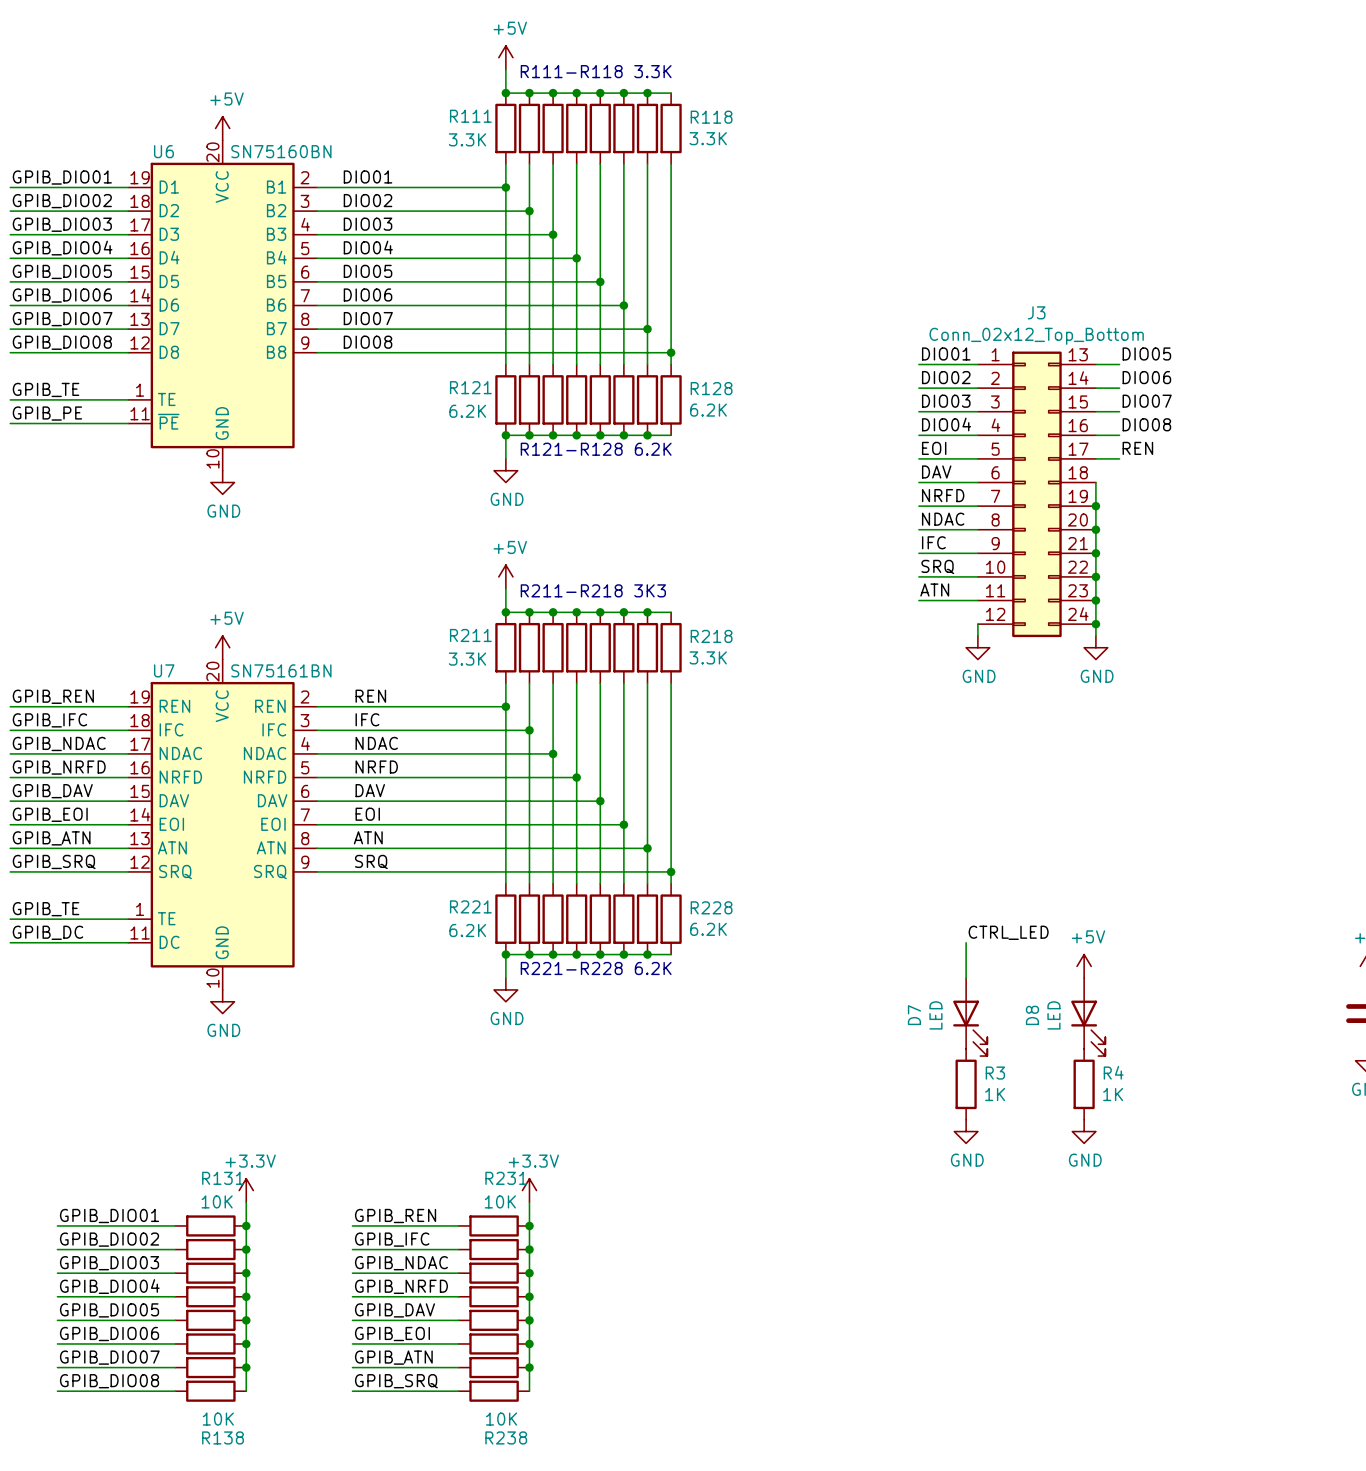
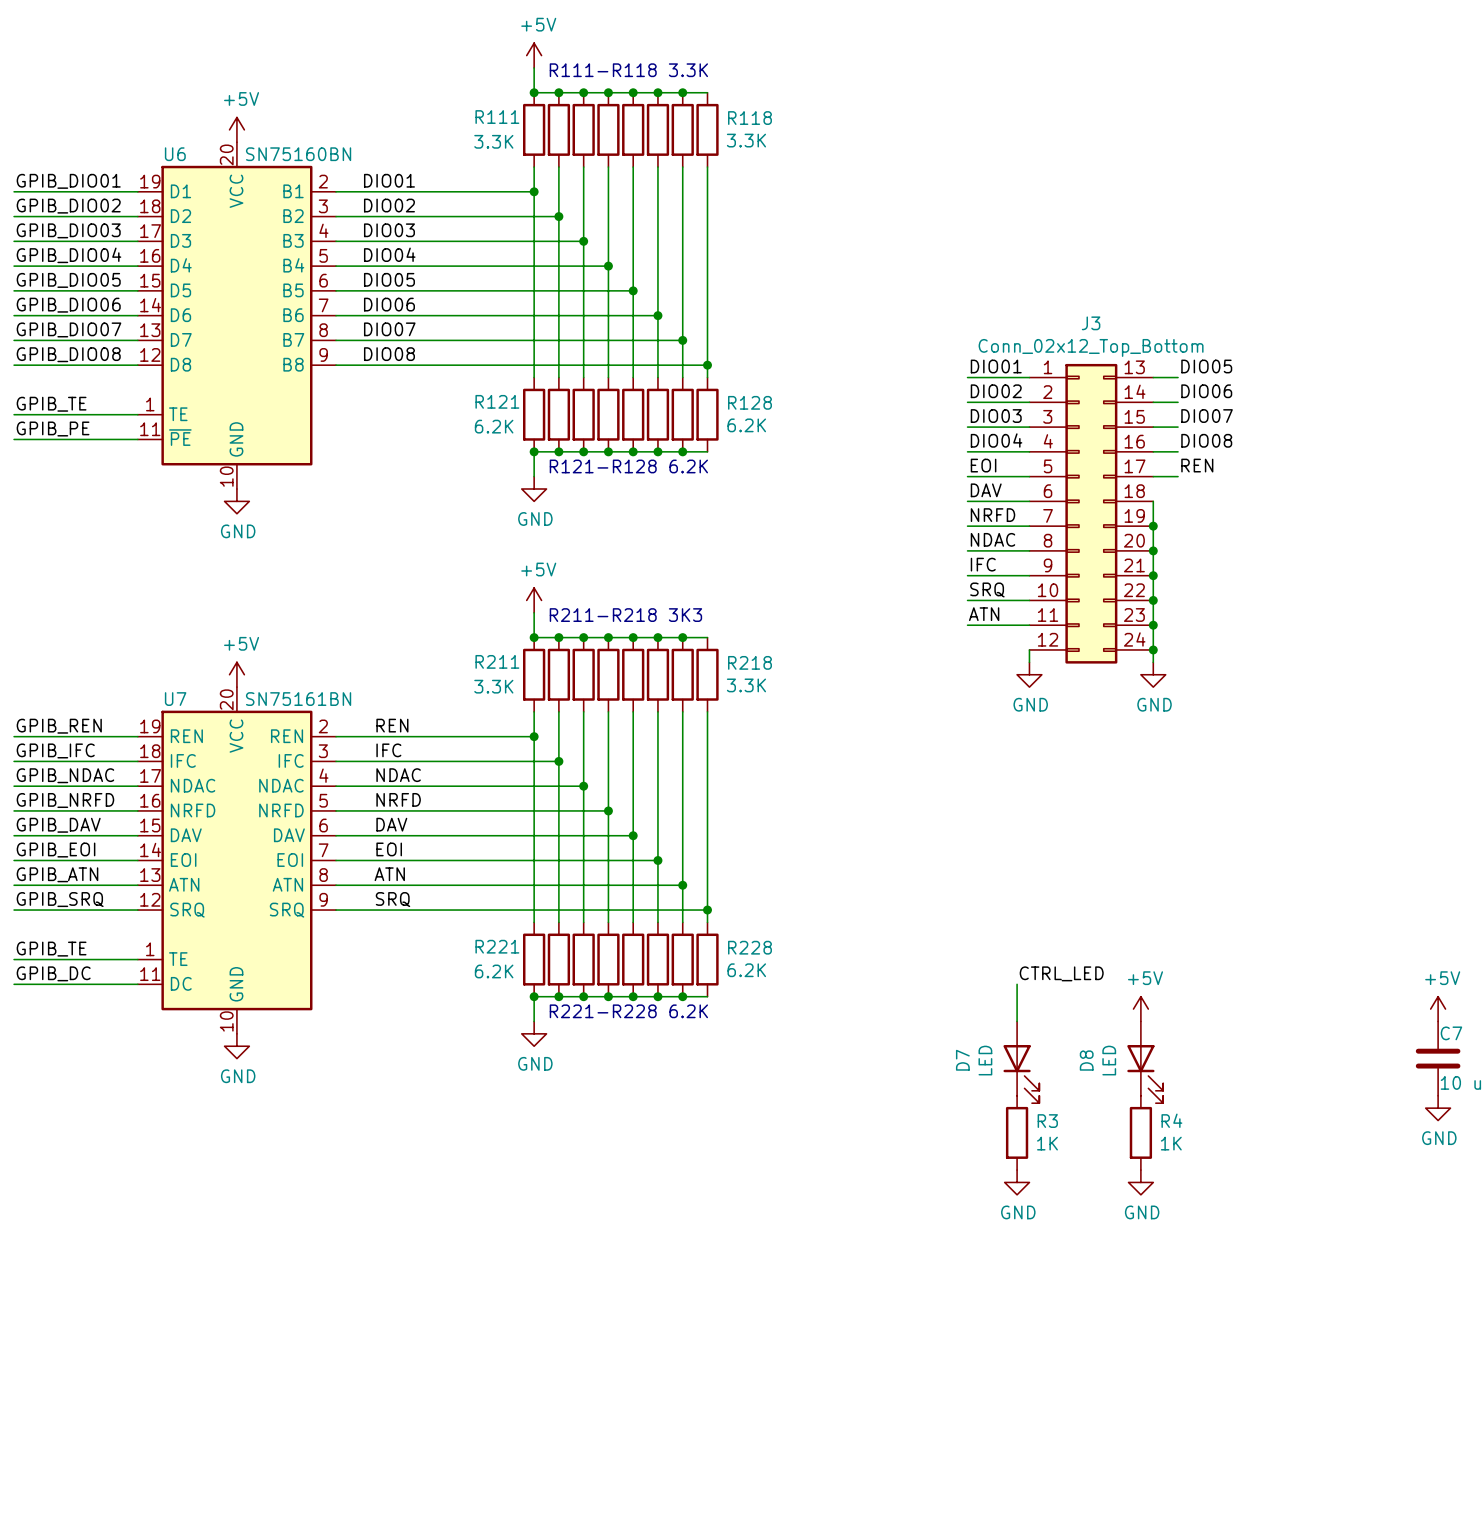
power symbol: +3.3V (246, 1190) -> none
power symbol: +3.3V (529, 1190) -> none
wire: (246, 1202) (246, 1391) -> none
wire: (529, 1202) (529, 1391) -> none
label: GPIB_DIO01 (109, 1216) -> none
label: GPIB_REN (395, 1216) -> none
wire: (57, 1225) (175, 1225) -> none
R131: 10K (210, 1225) -> none
junction: (246, 1225) -> none
wire: (352, 1225) (458, 1225) -> none
R231: 10K (494, 1225) -> none
junction: (529, 1225) -> none
label: GPIB_DIO02 (109, 1239) -> none
label: GPIB_IFC (392, 1239) -> none
wire: (57, 1249) (175, 1249) -> none
part: (210, 1249) -> none
junction: (246, 1249) -> none
wire: (352, 1249) (458, 1249) -> none
part: (494, 1249) -> none
junction: (529, 1249) -> none
label: GPIB_DIO03 (109, 1263) -> none
label: GPIB_NDAC (401, 1263) -> none
wire: (57, 1273) (175, 1273) -> none
part: (210, 1273) -> none
junction: (246, 1273) -> none
wire: (352, 1273) (458, 1273) -> none
part: (494, 1273) -> none
junction: (529, 1273) -> none
label: GPIB_DIO04 (109, 1286) -> none
label: GPIB_NRFD (401, 1286) -> none
wire: (57, 1296) (175, 1296) -> none
part: (210, 1296) -> none
junction: (246, 1296) -> none
wire: (352, 1296) (458, 1296) -> none
part: (494, 1296) -> none
junction: (529, 1296) -> none
label: GPIB_DIO05 (109, 1310) -> none
label: GPIB_DAV (394, 1310) -> none
wire: (57, 1320) (175, 1320) -> none
part: (210, 1320) -> none
junction: (246, 1320) -> none
wire: (352, 1320) (458, 1320) -> none
part: (494, 1320) -> none
junction: (529, 1320) -> none
label: GPIB_DIO06 (109, 1334) -> none
label: GPIB_EOI (392, 1334) -> none
wire: (57, 1343) (175, 1343) -> none
part: (210, 1343) -> none
junction: (246, 1343) -> none
wire: (352, 1343) (458, 1343) -> none
part: (494, 1343) -> none
junction: (529, 1343) -> none
label: GPIB_DIO07 (109, 1357) -> none
label: GPIB_ATN (393, 1357) -> none
wire: (57, 1367) (175, 1367) -> none
part: (210, 1367) -> none
junction: (246, 1367) -> none
wire: (352, 1367) (458, 1367) -> none
part: (494, 1367) -> none
junction: (529, 1367) -> none
label: GPIB_DIO08 (109, 1381) -> none
label: GPIB_SRQ (396, 1381) -> none
wire: (57, 1391) (175, 1391) -> none
R138: 10K (210, 1391) -> none
wire: (352, 1391) (458, 1391) -> none
R238: 10K (494, 1391) -> none

